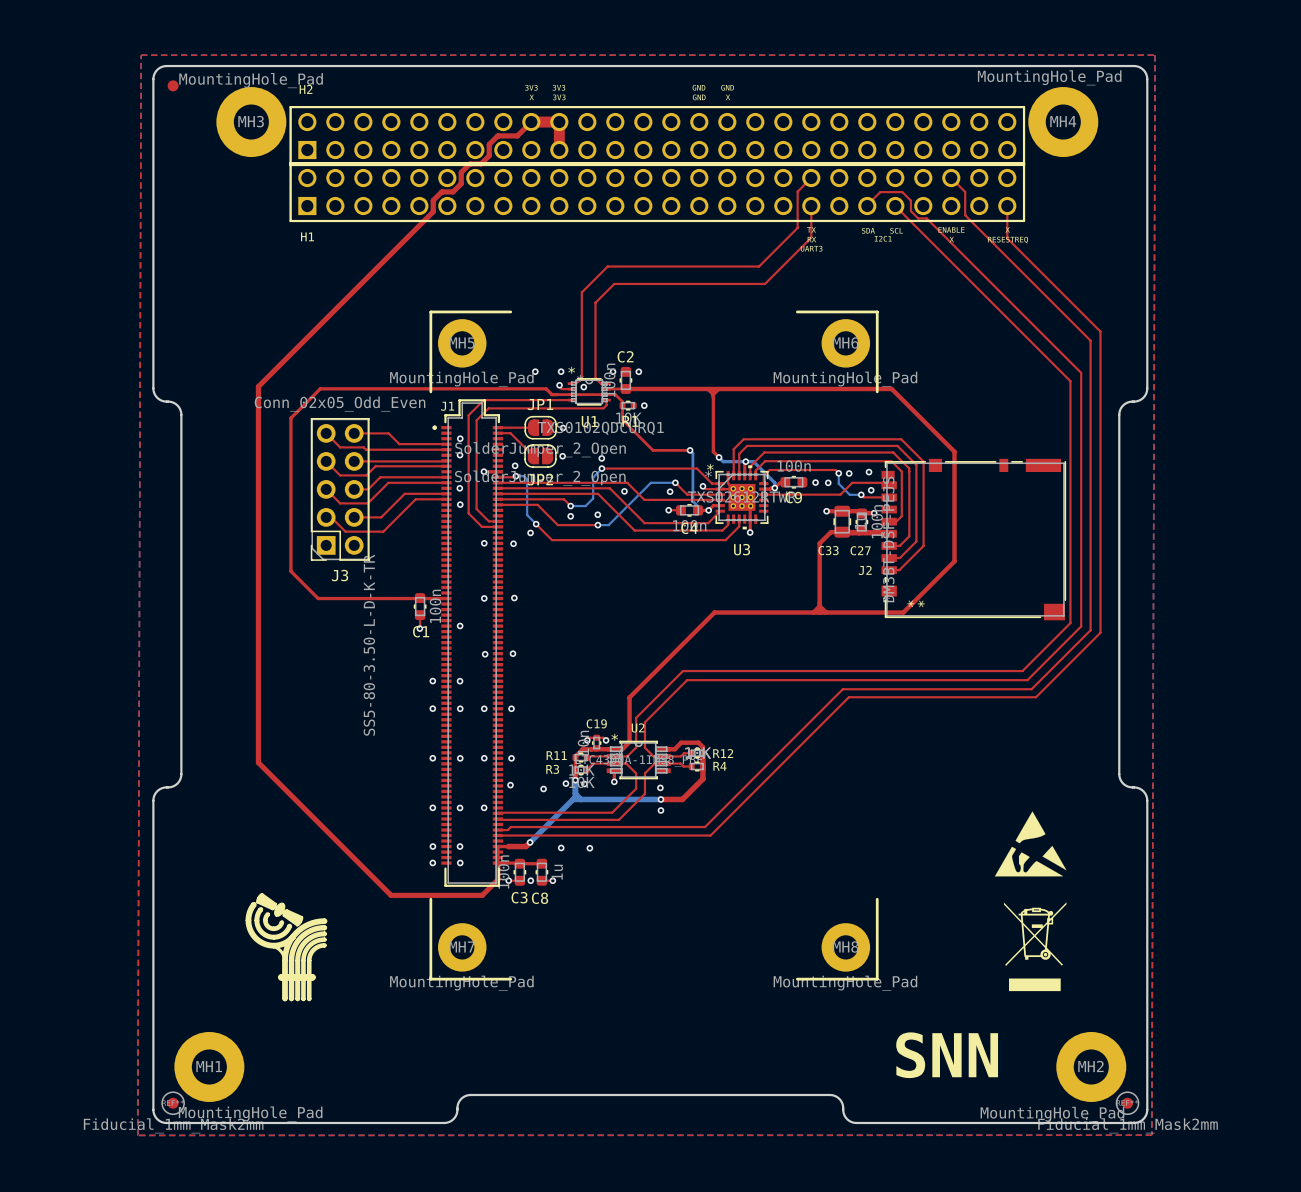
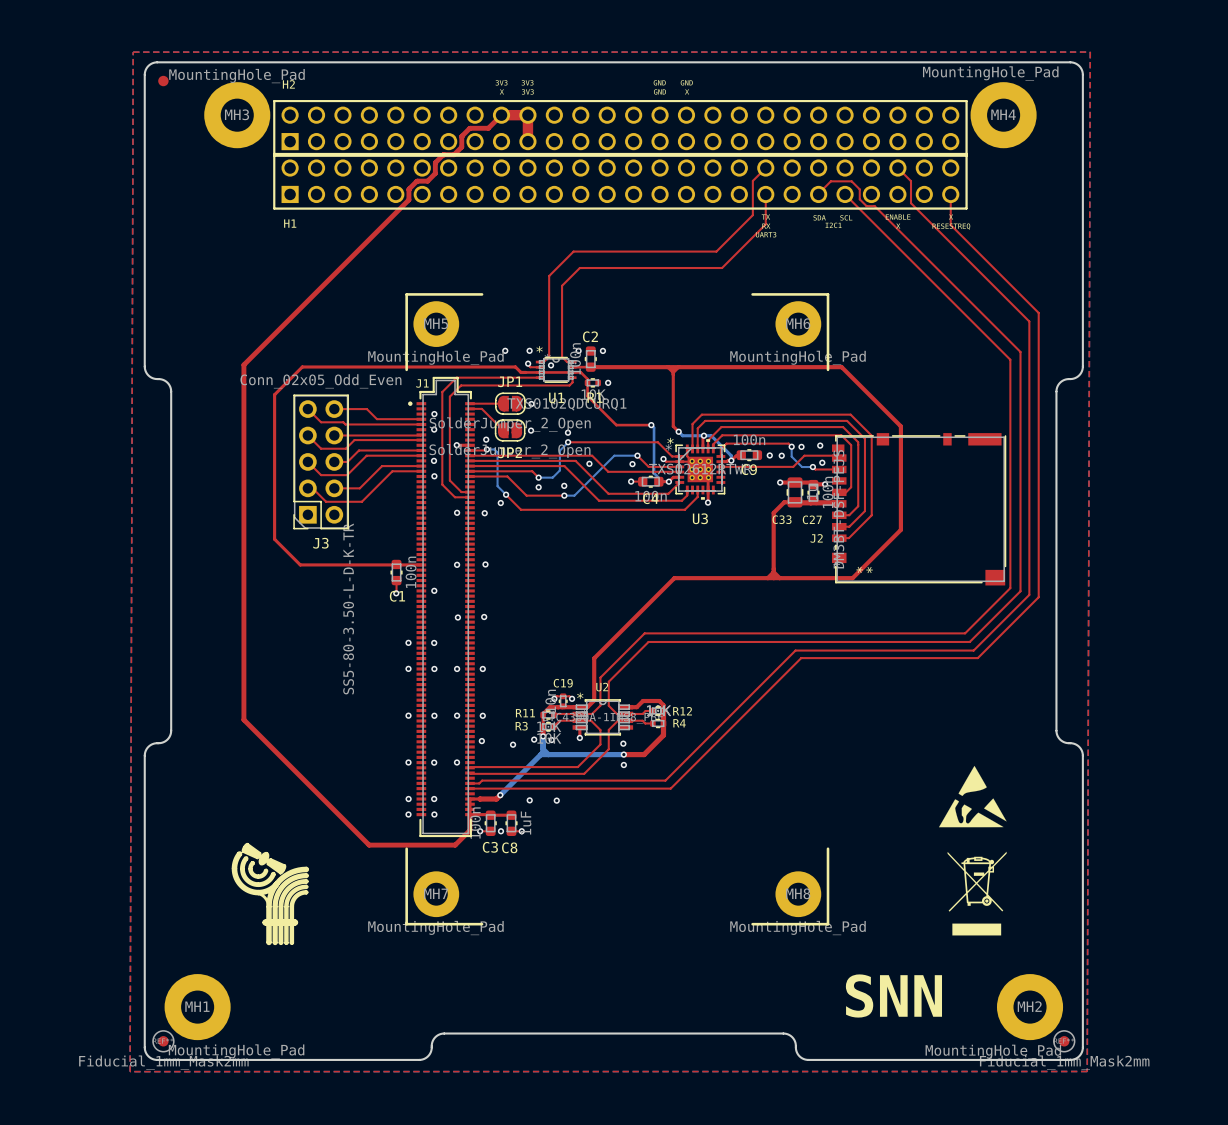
C8 value: 1u (557, 872) -> 1uF (526, 823)

